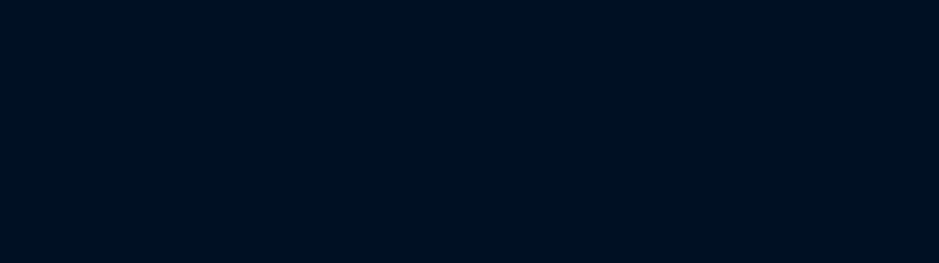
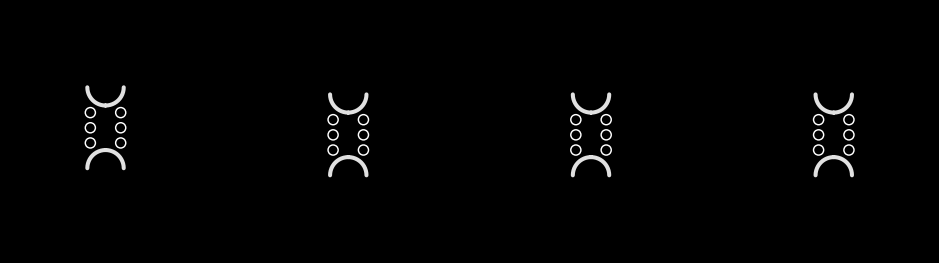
part: none -> (105, 127)
part: none -> (348, 134)
part: none -> (591, 134)
part: none -> (833, 134)

